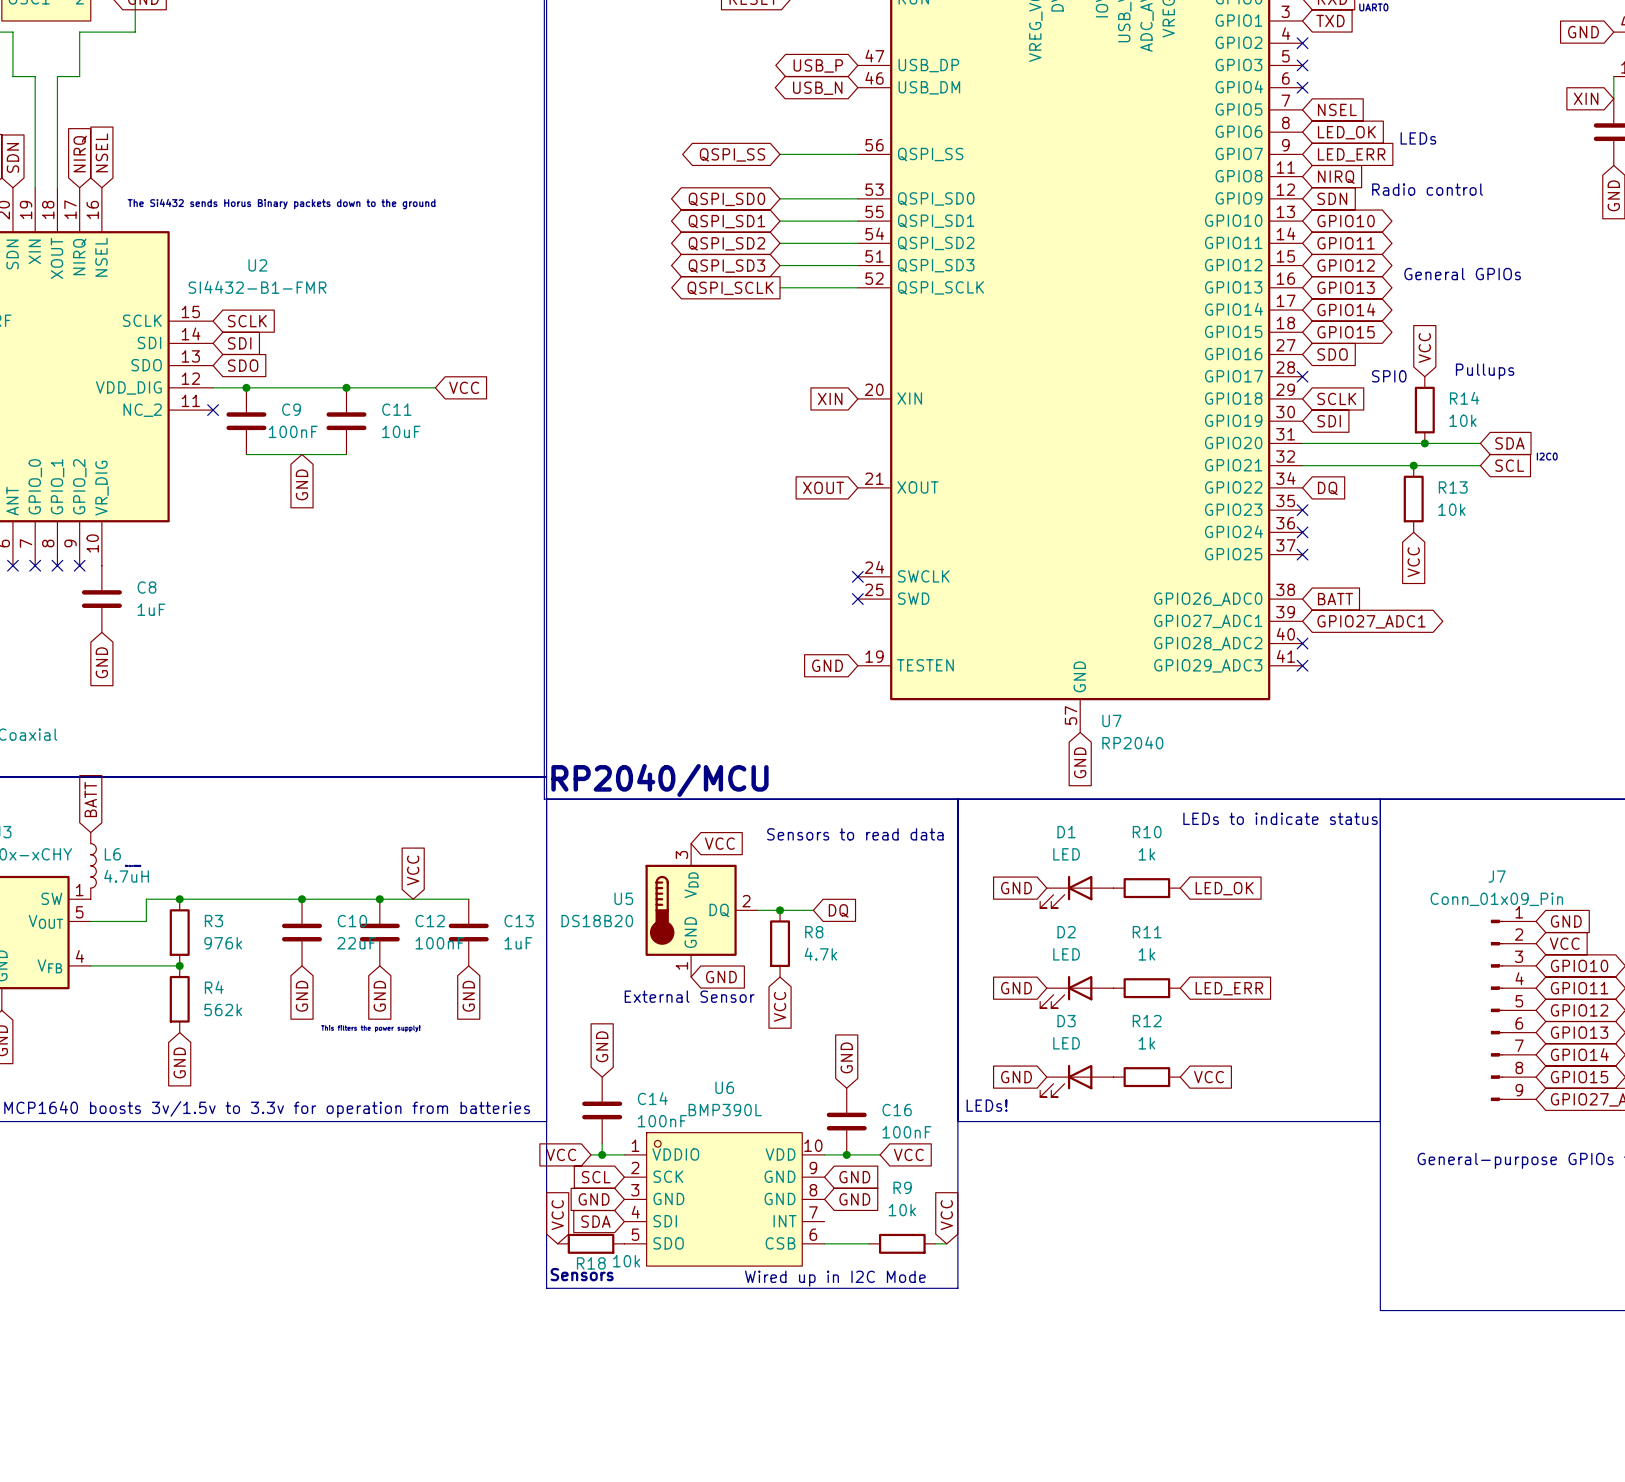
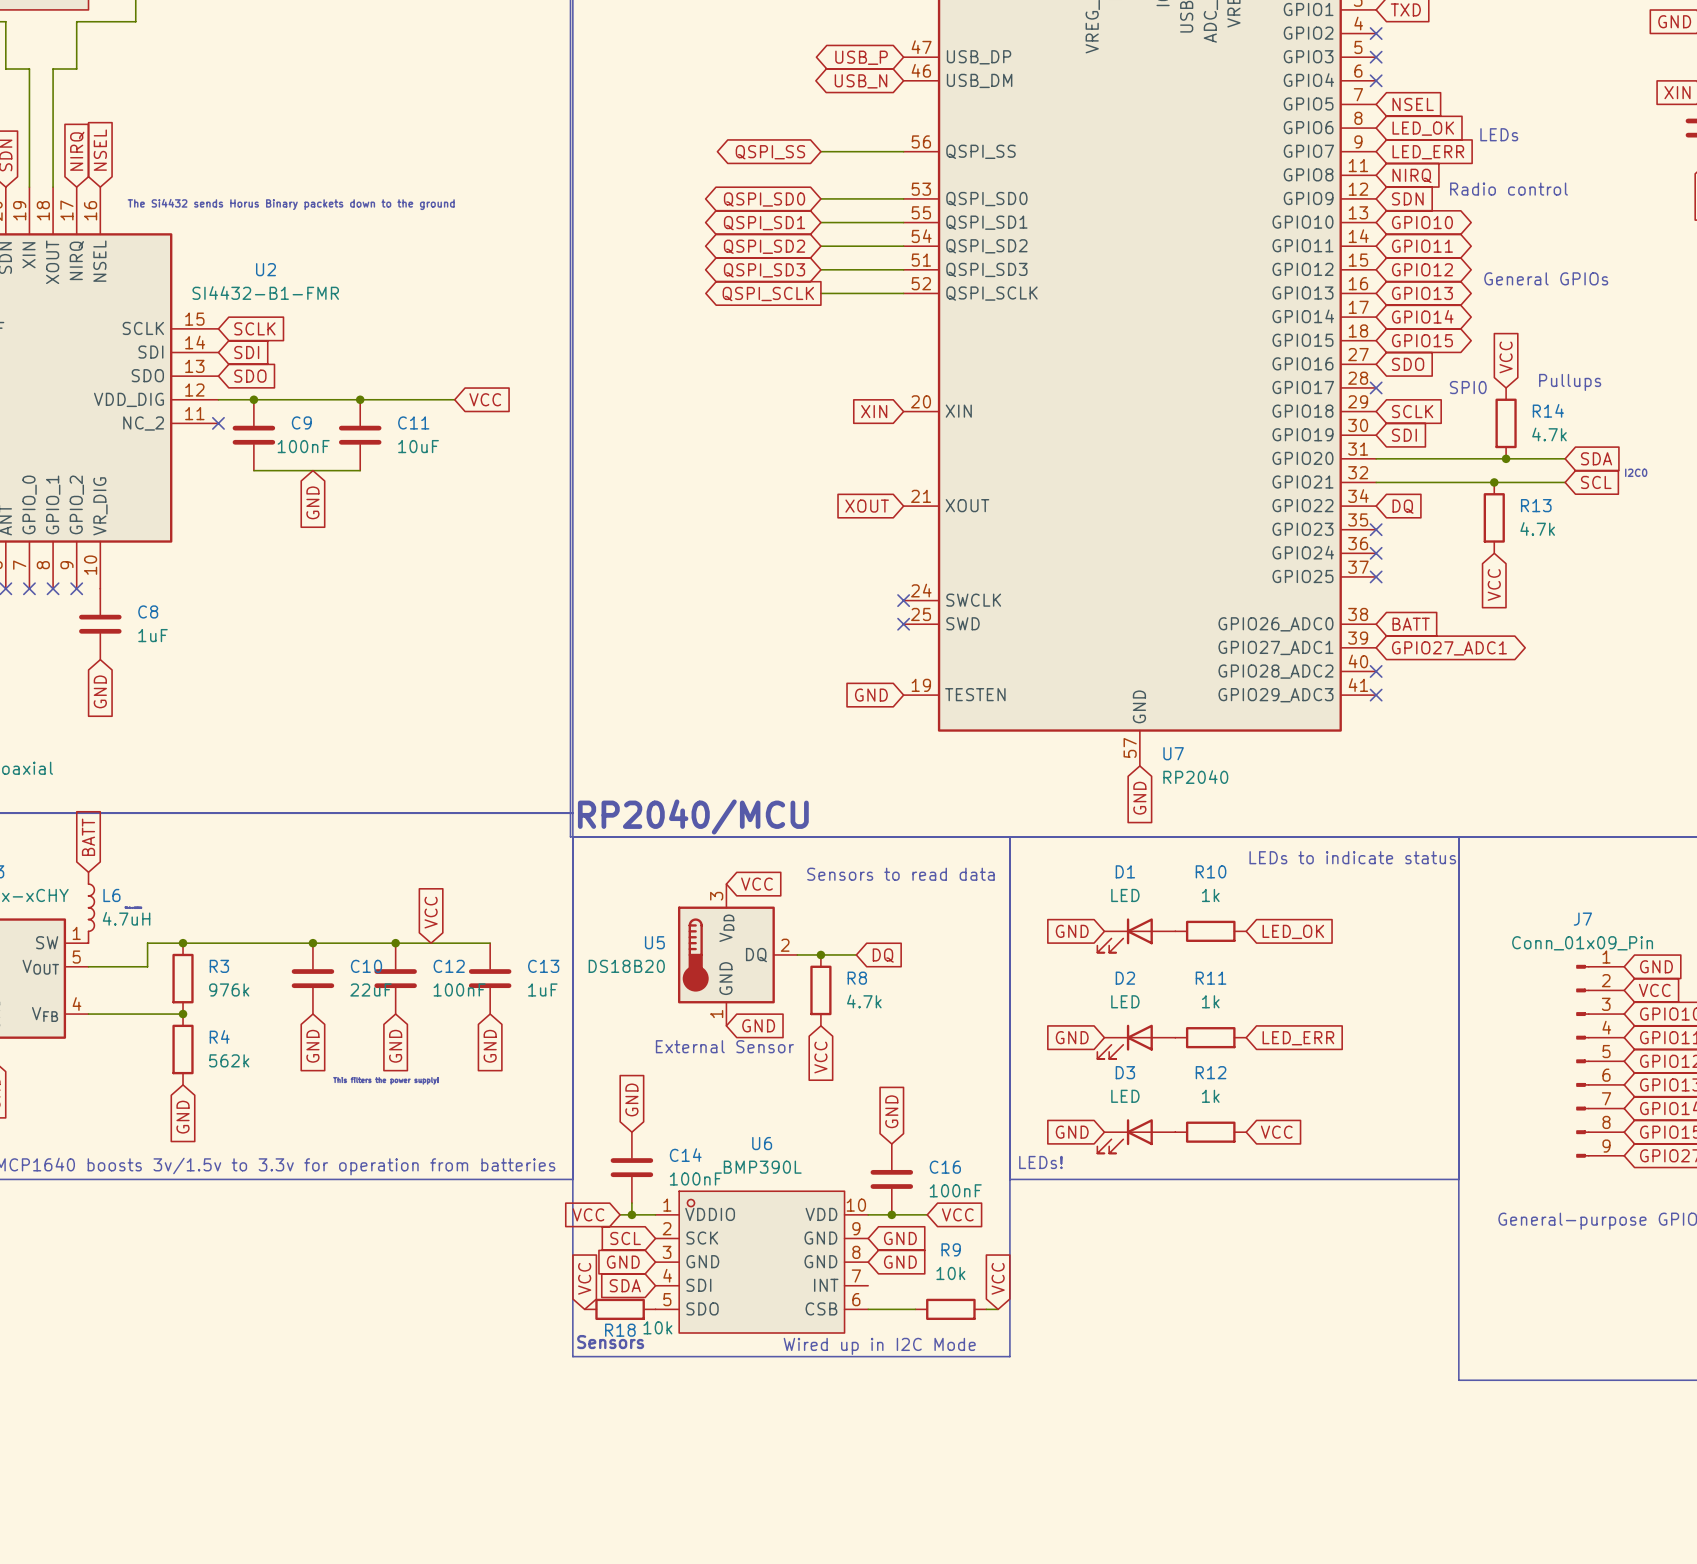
R14 value: 10k (1463, 420) -> 4.7k (1549, 434)
R13 value: 10k (1451, 509) -> 4.7k (1537, 528)

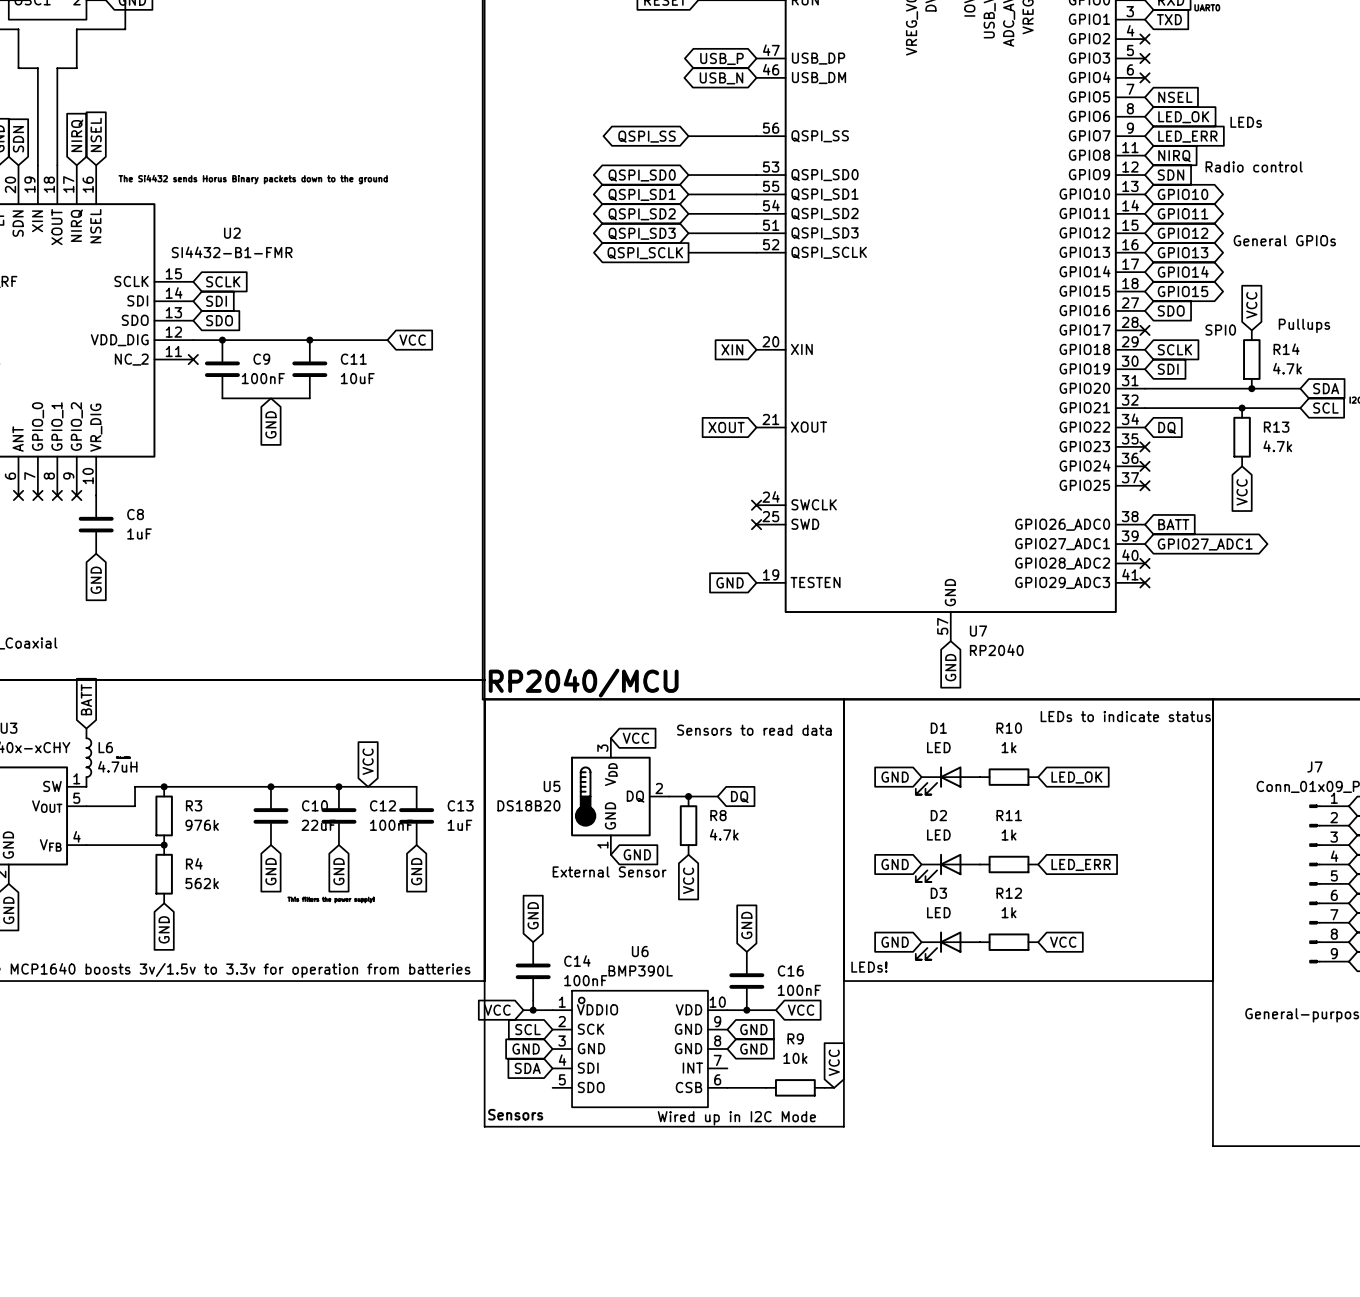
global label: VCC (584, 1278) -> none
R18: 10k (620, 1309) -> none

